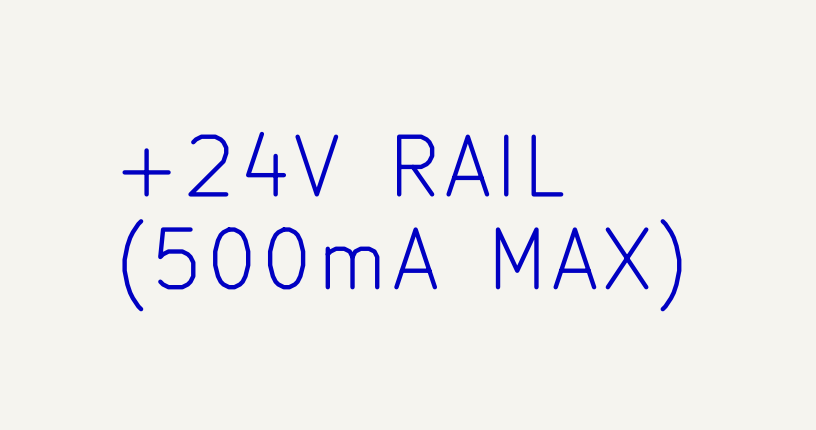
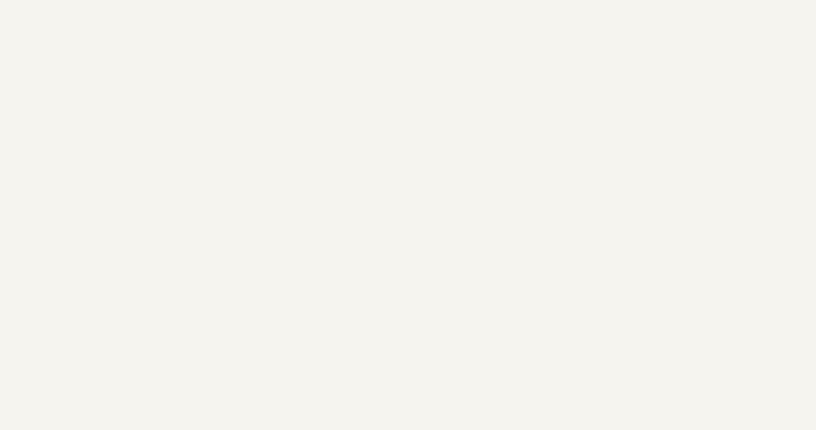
text: +24V RAIL (342, 164) -> none
text: (500mA MAX) (401, 265) -> none

